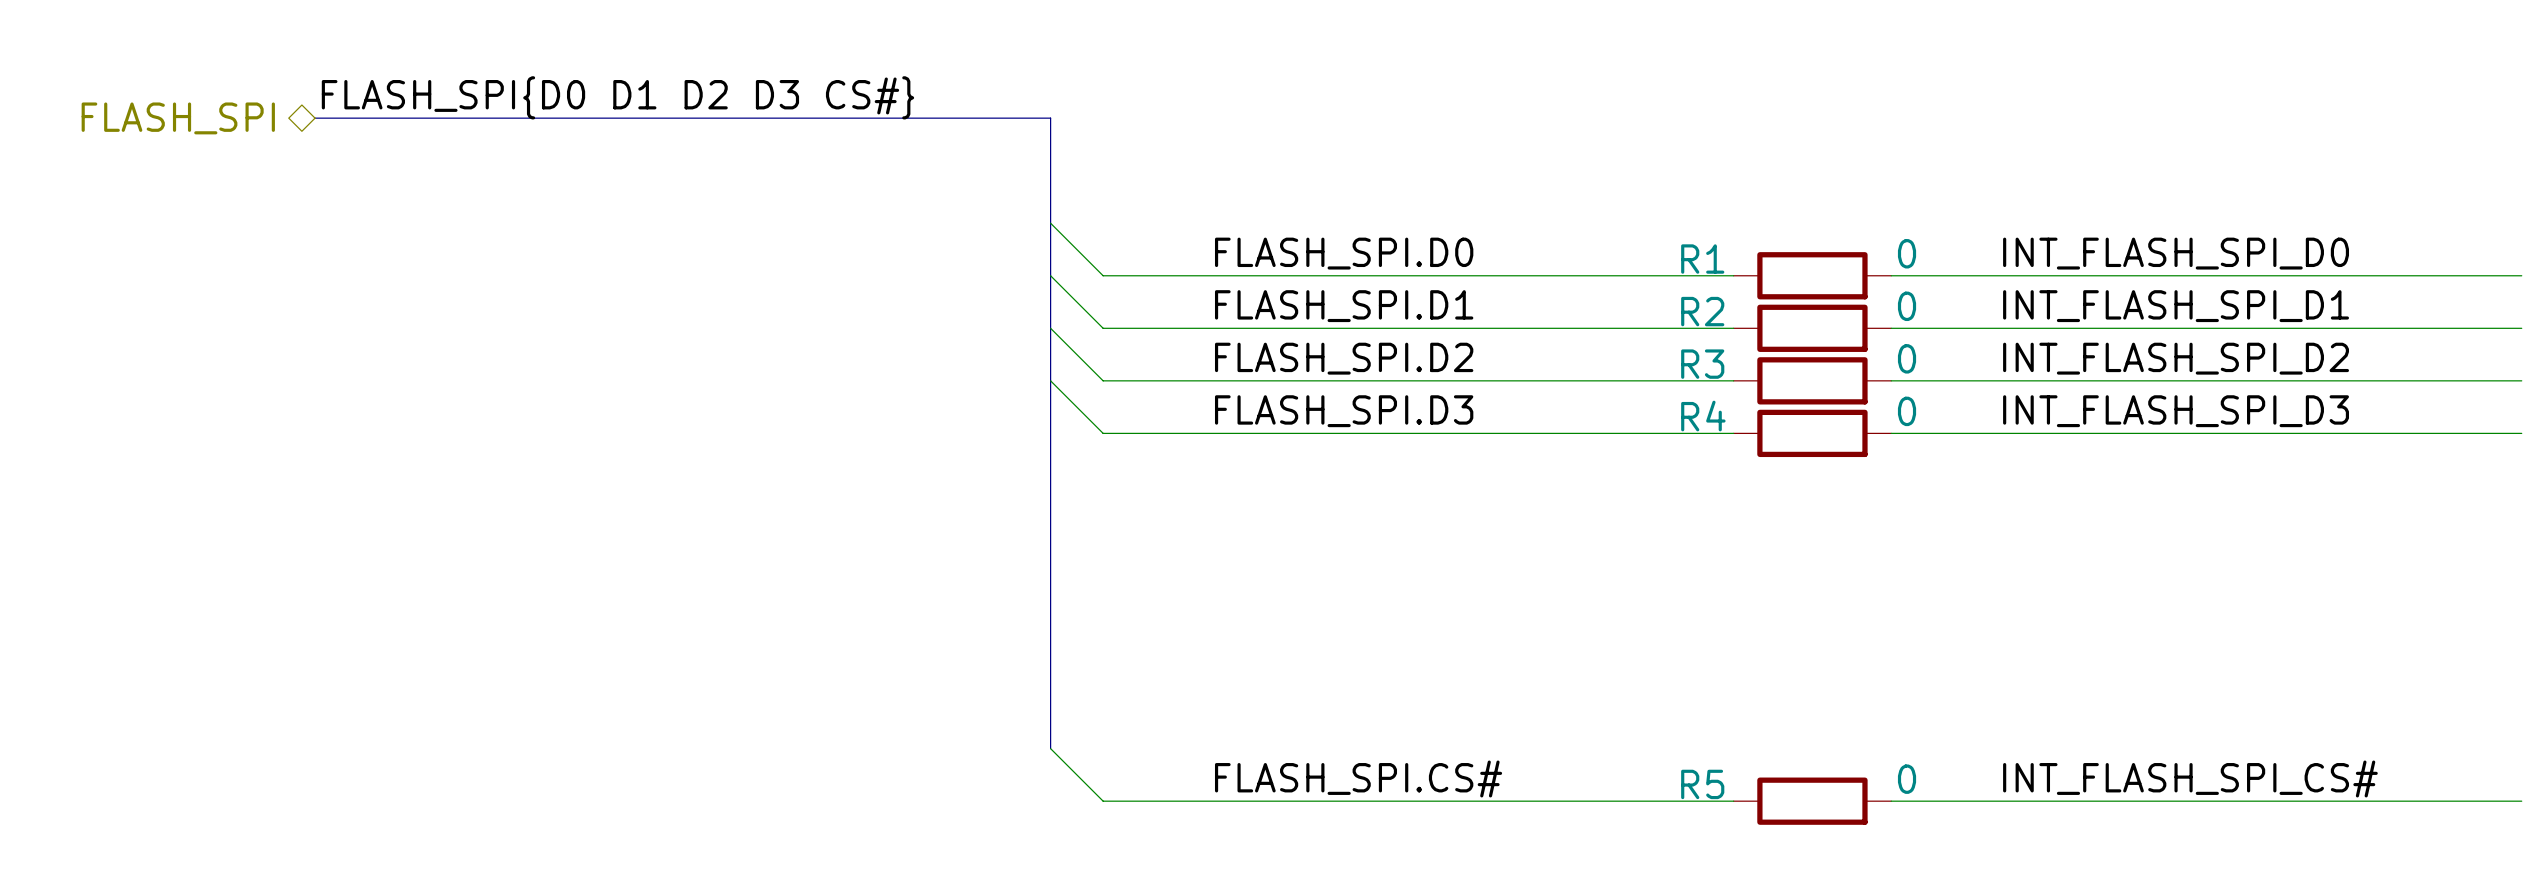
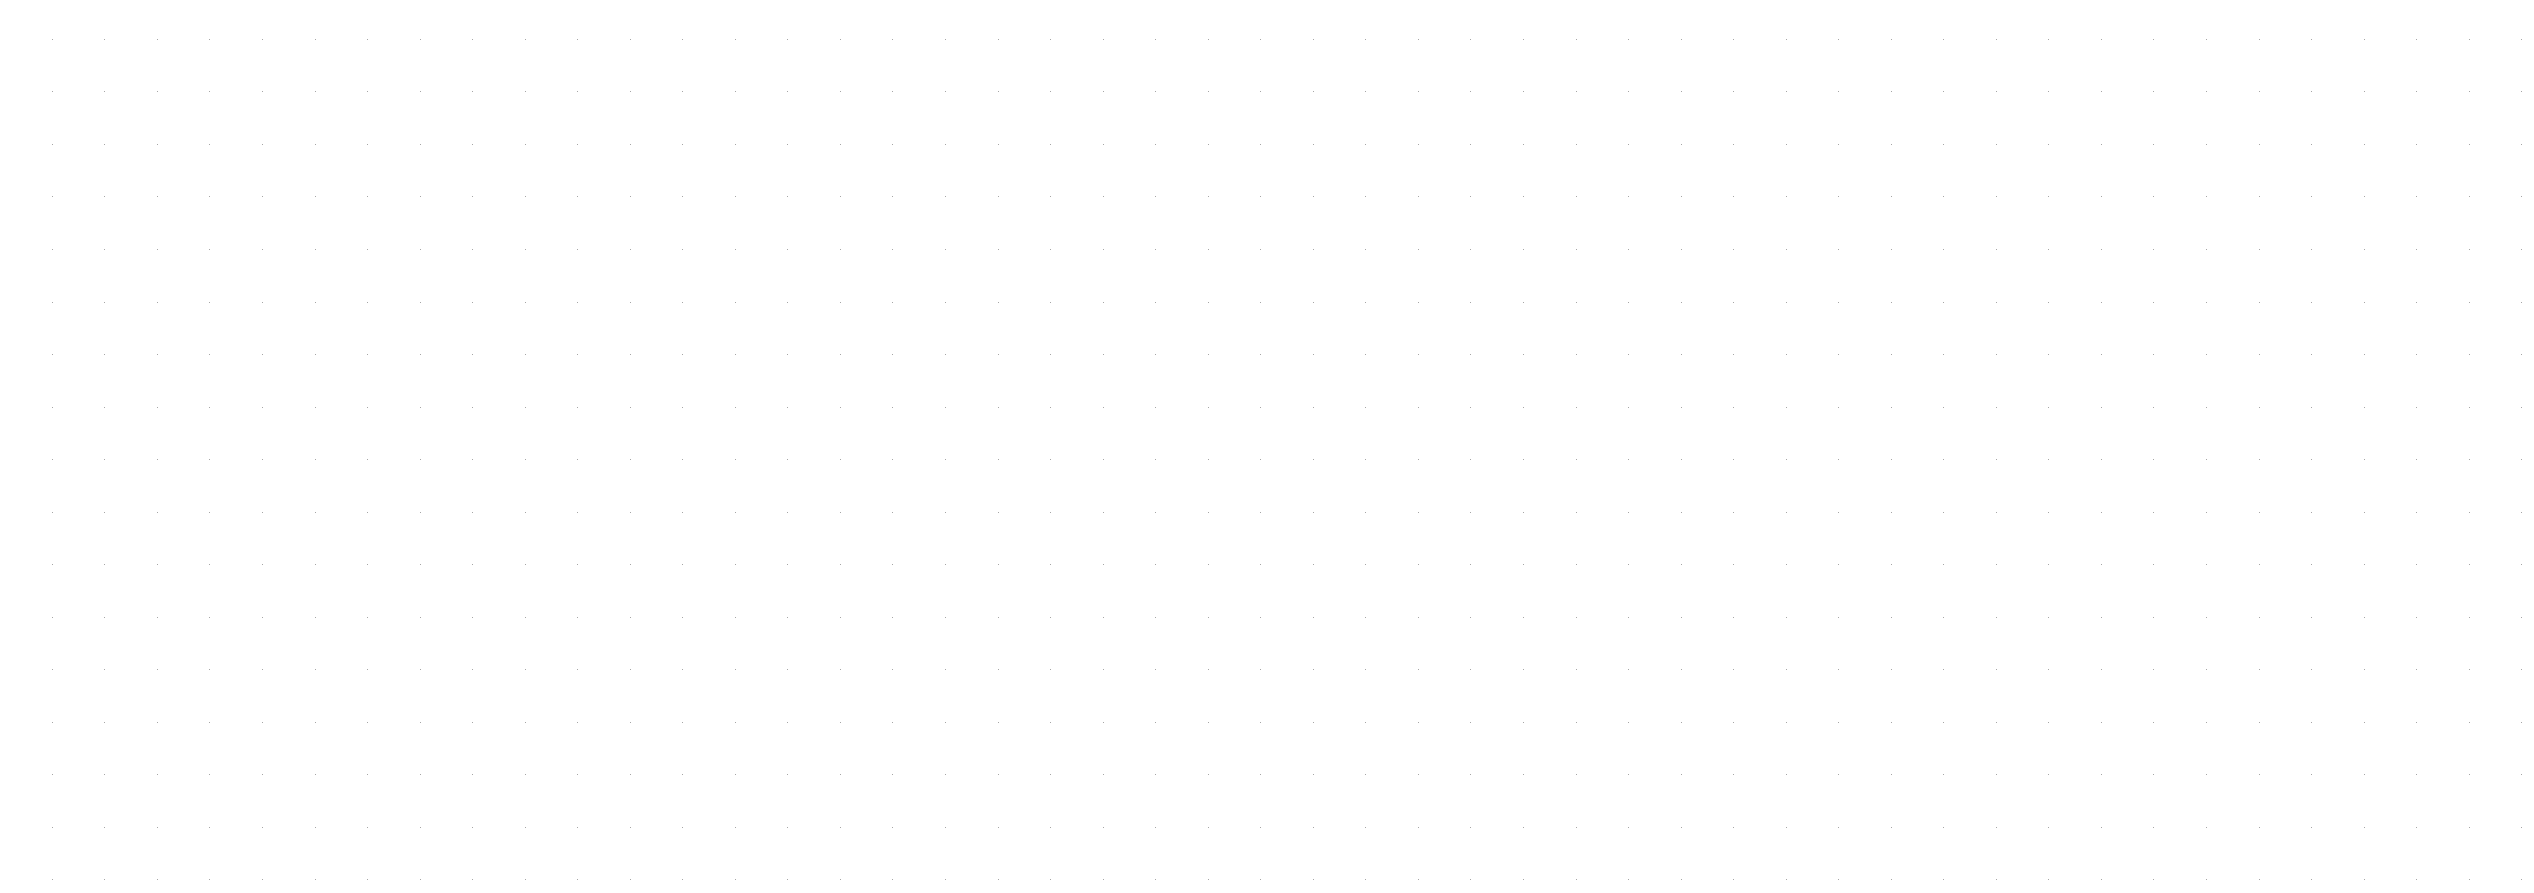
label: FLASH_SPI{D0 D1 D2 D3 CS#} (617, 97) -> none
hierarchical label: FLASH_SPI (178, 118) -> none
bus: (315, 118) (1050, 118) (1050, 748) -> none
wire: (1050, 223) (1103, 275) (1733, 275) -> none
label: FLASH_SPI.D0 (1344, 253) -> none
label: INT_FLASH_SPI_D0 (2176, 253) -> none
wire: (1050, 275) (1103, 328) (1733, 328) -> none
R1: 0 (1812, 275) -> none
wire: (1891, 275) (2521, 275) -> none
label: FLASH_SPI.D1 (1344, 306) -> none
label: INT_FLASH_SPI_D1 (2176, 306) -> none
wire: (1050, 328) (1103, 380) (1733, 380) -> none
R2: 0 (1812, 328) -> none
wire: (1891, 328) (2521, 328) -> none
label: FLASH_SPI.D2 (1344, 358) -> none
label: INT_FLASH_SPI_D2 (2176, 358) -> none
wire: (1050, 380) (1103, 433) (1733, 433) -> none
R3: 0 (1812, 380) -> none
wire: (1891, 380) (2521, 380) -> none
label: FLASH_SPI.D3 (1344, 411) -> none
label: INT_FLASH_SPI_D3 (2176, 411) -> none
R4: 0 (1812, 433) -> none
wire: (1891, 433) (2521, 433) -> none
wire: (1050, 748) (1103, 801) (1733, 801) -> none
label: FLASH_SPI.CS# (1358, 778) -> none
label: INT_FLASH_SPI_CS# (2190, 778) -> none
R5: 0 (1812, 801) -> none
wire: (1891, 801) (2521, 801) -> none

